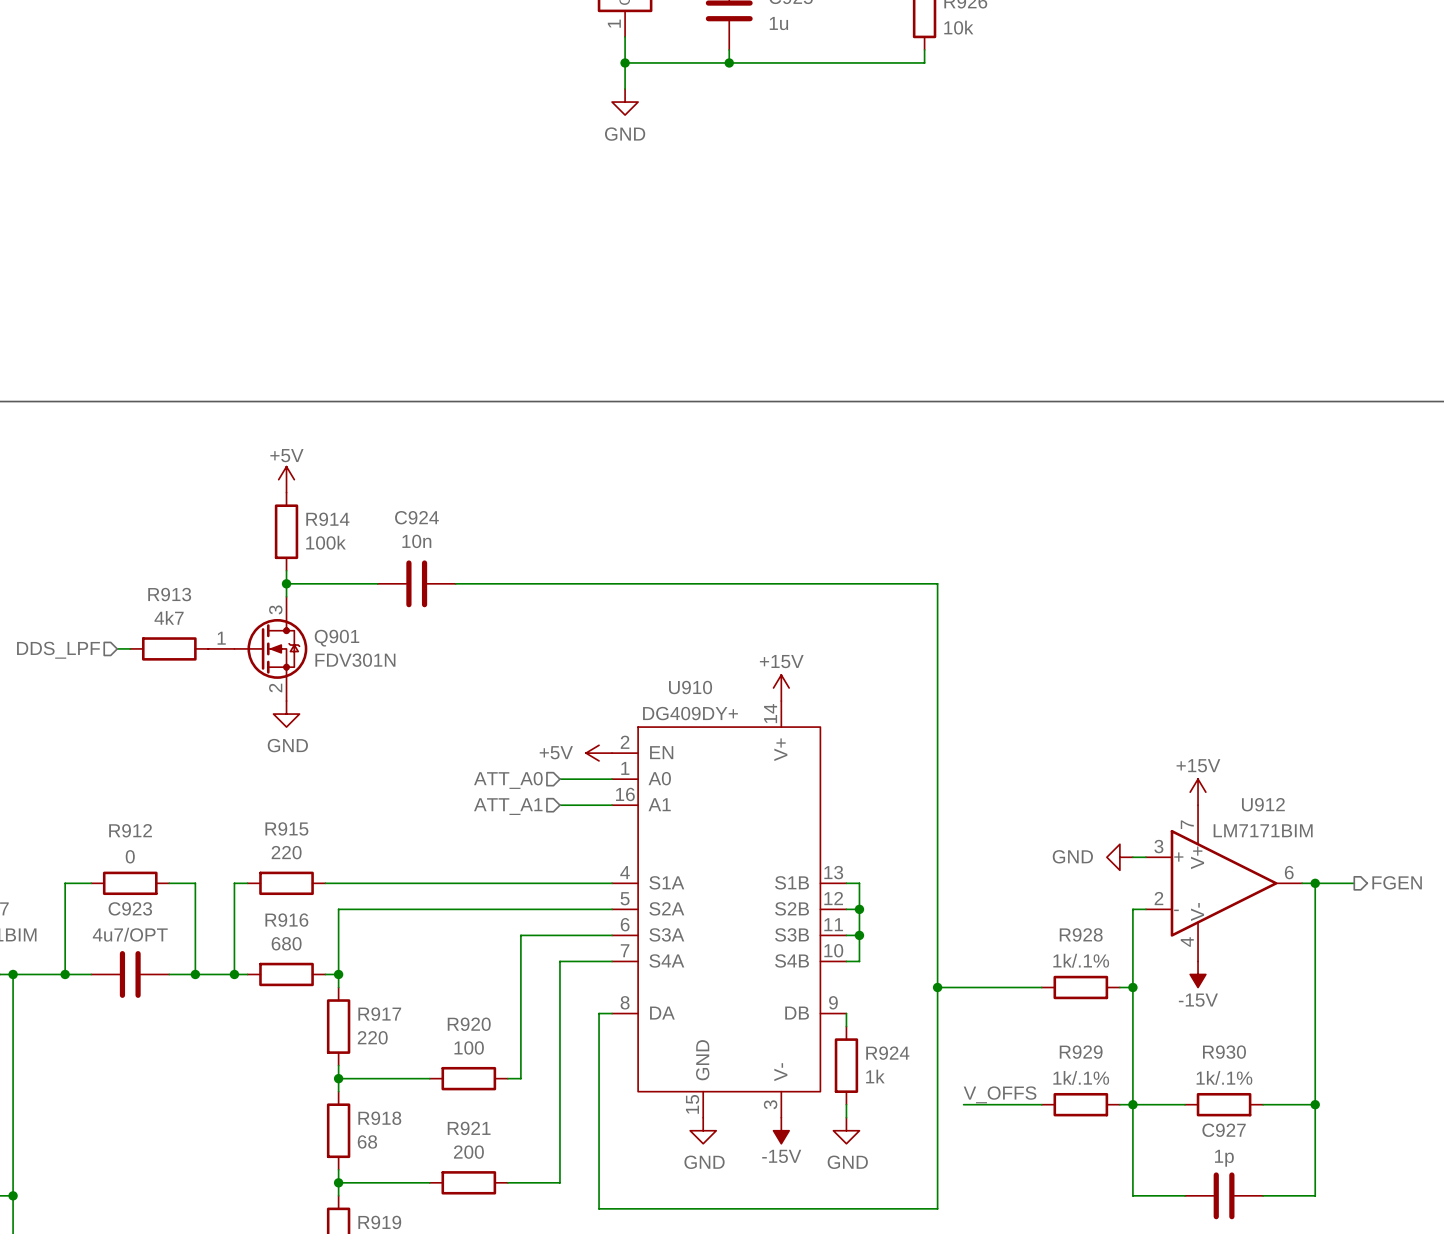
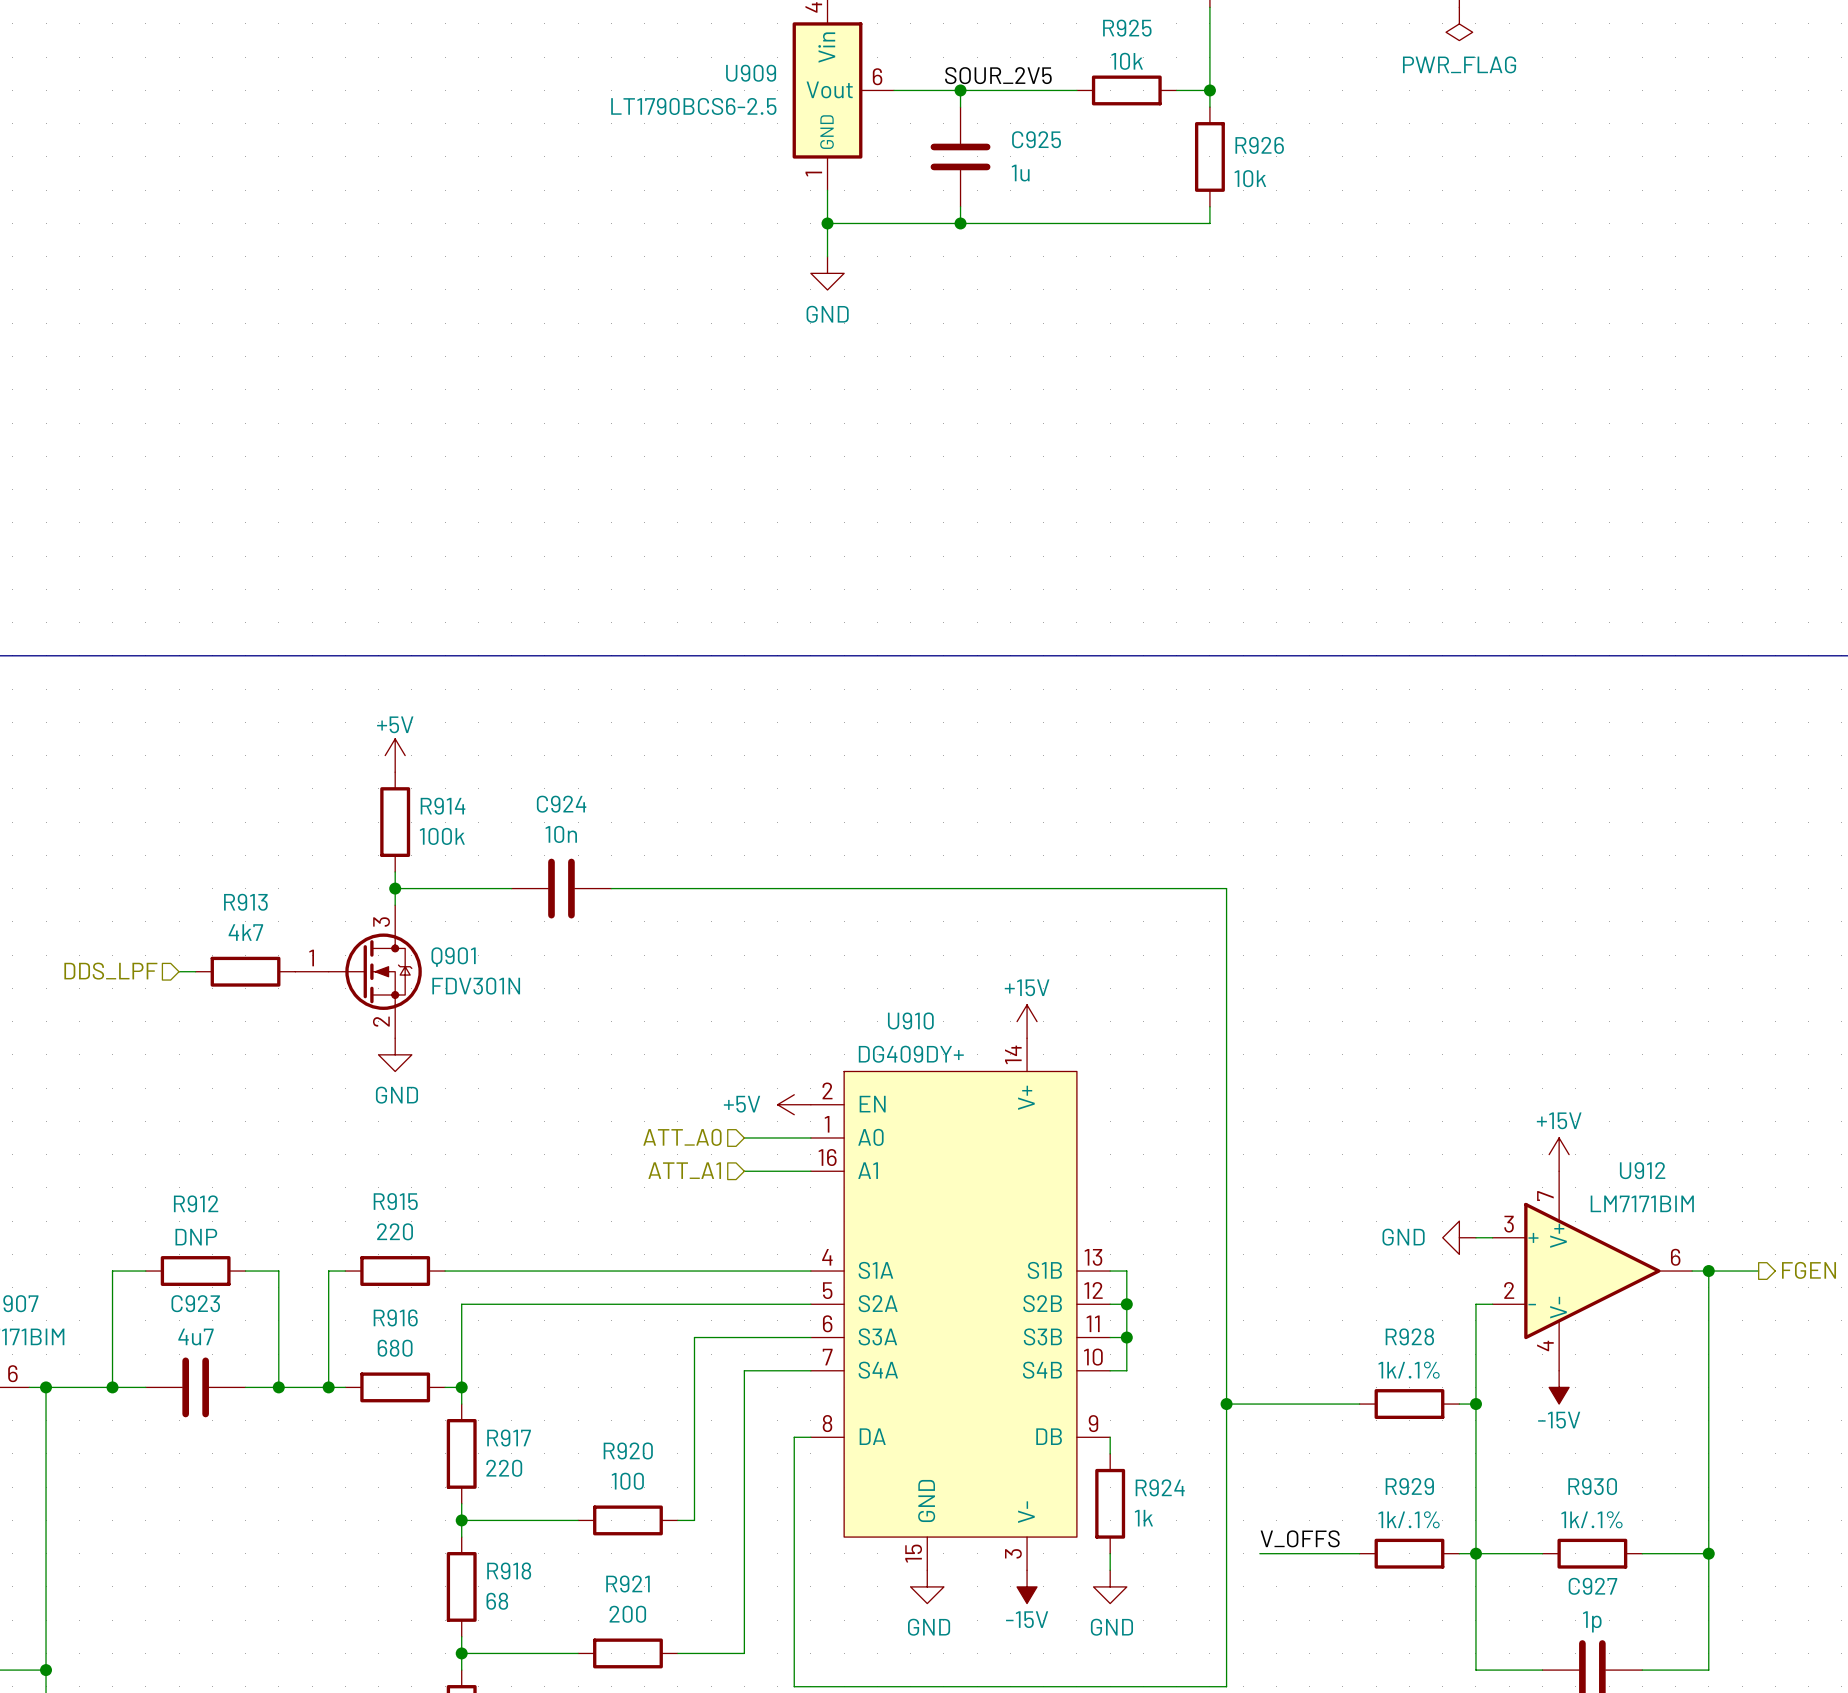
R912 value: 0 (130, 856) -> DNP (196, 1237)
C923 value: 4u7/OPT (130, 934) -> 4u7 (195, 1336)

